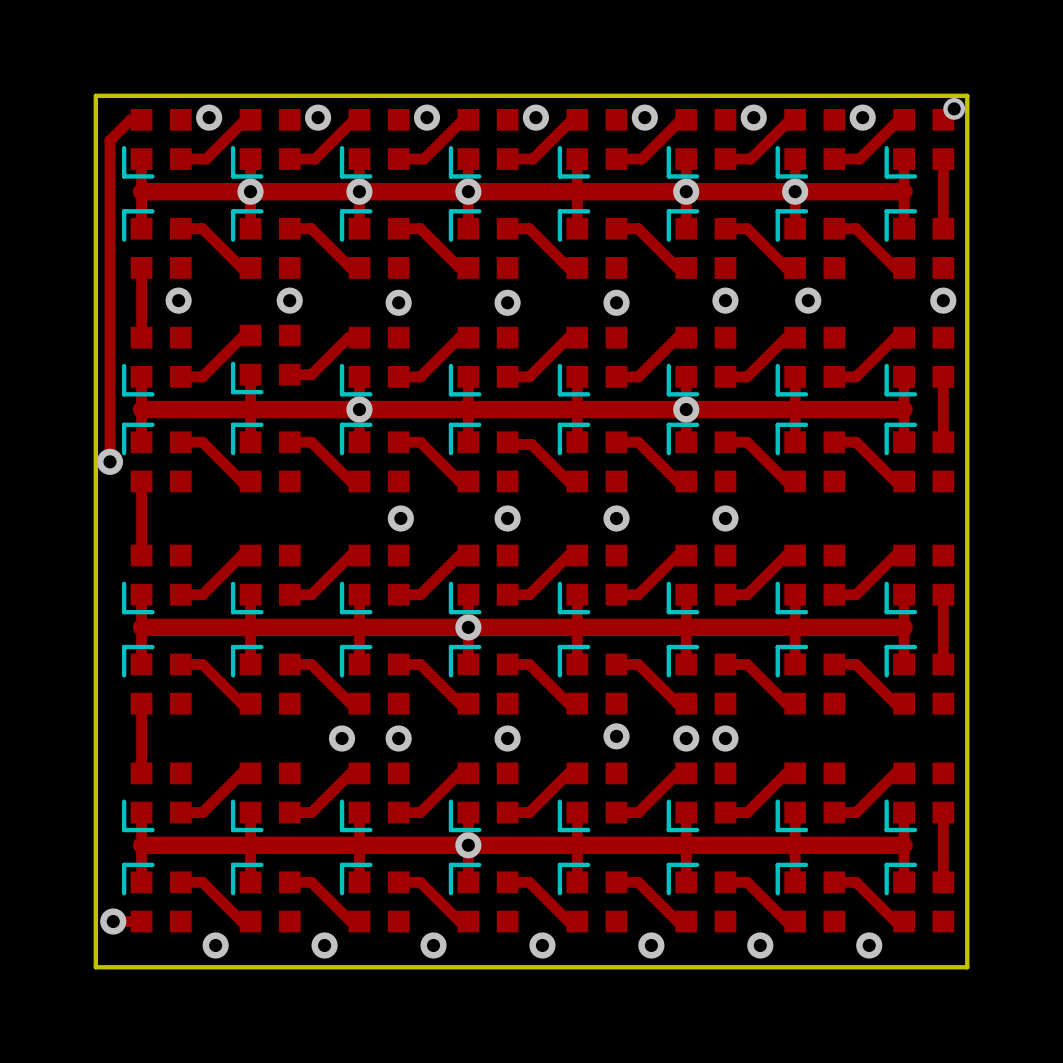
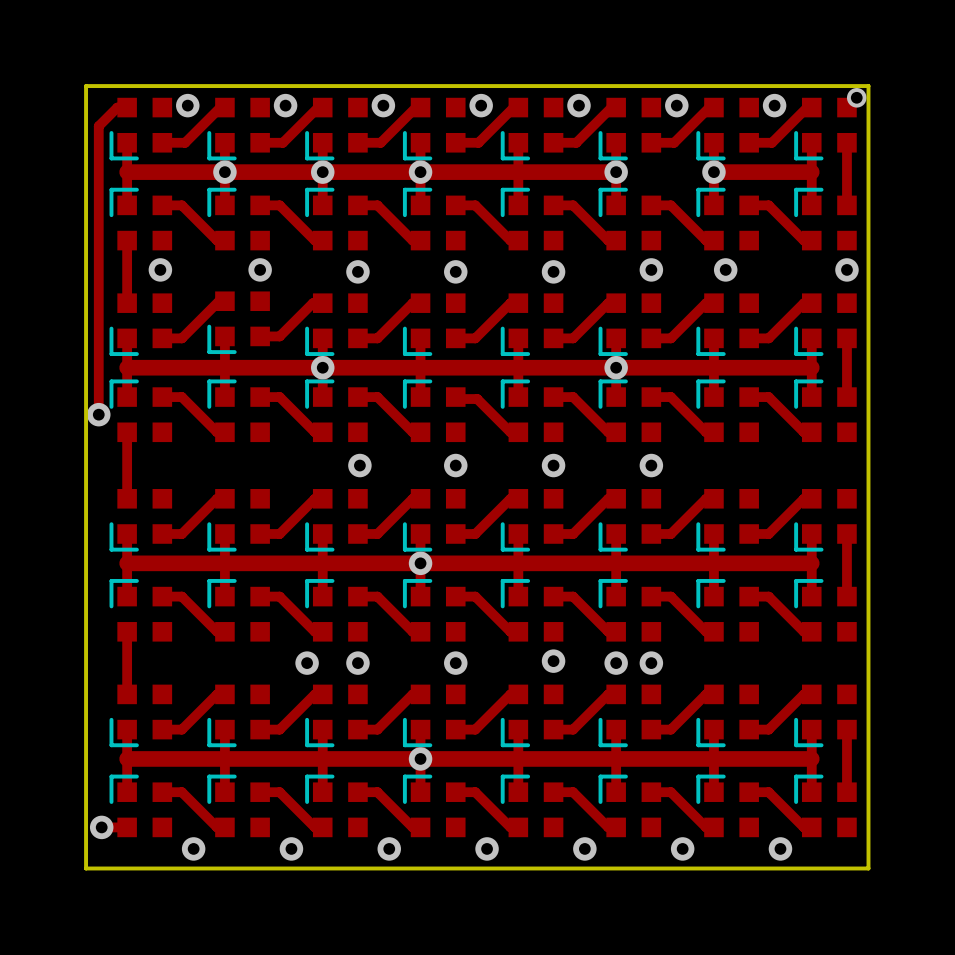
track: (686, 191) (795, 191) -> none

